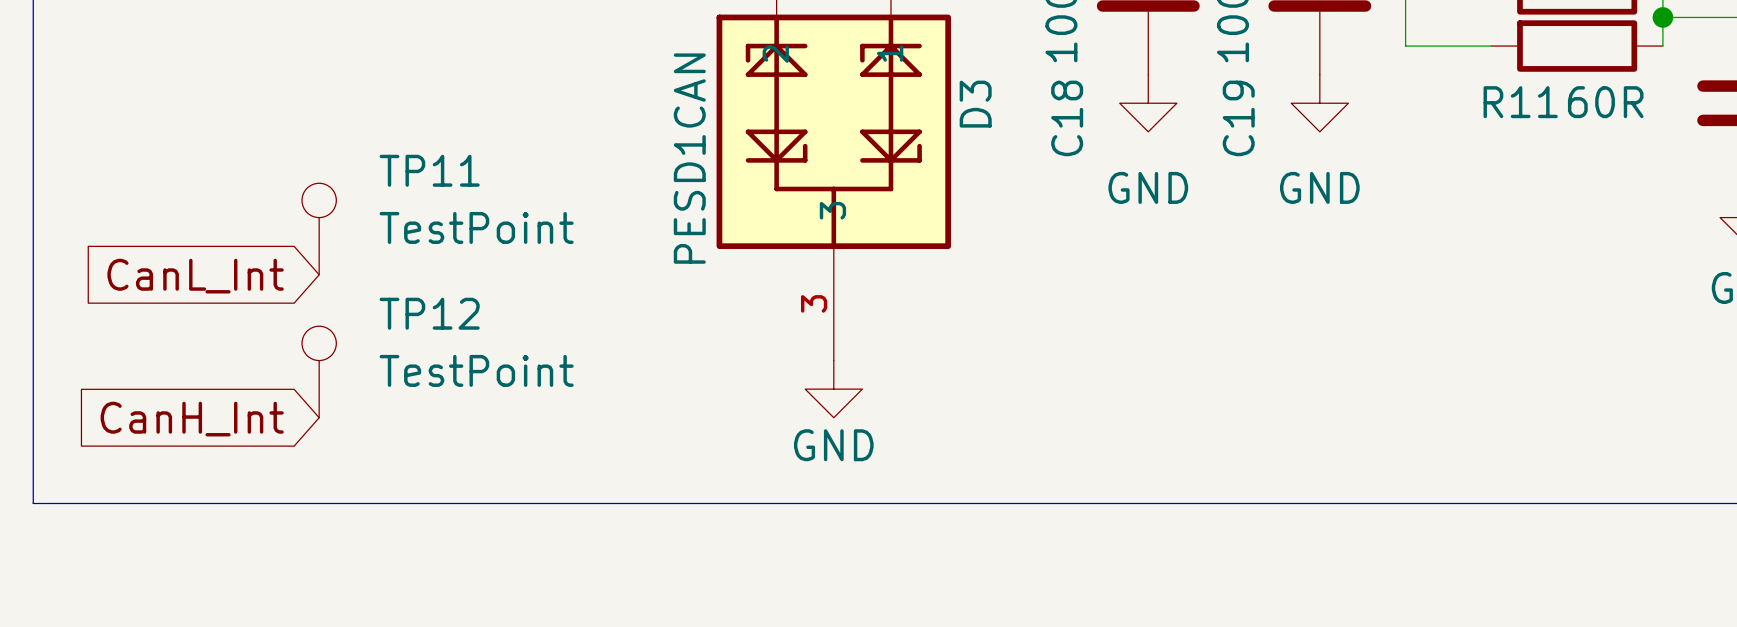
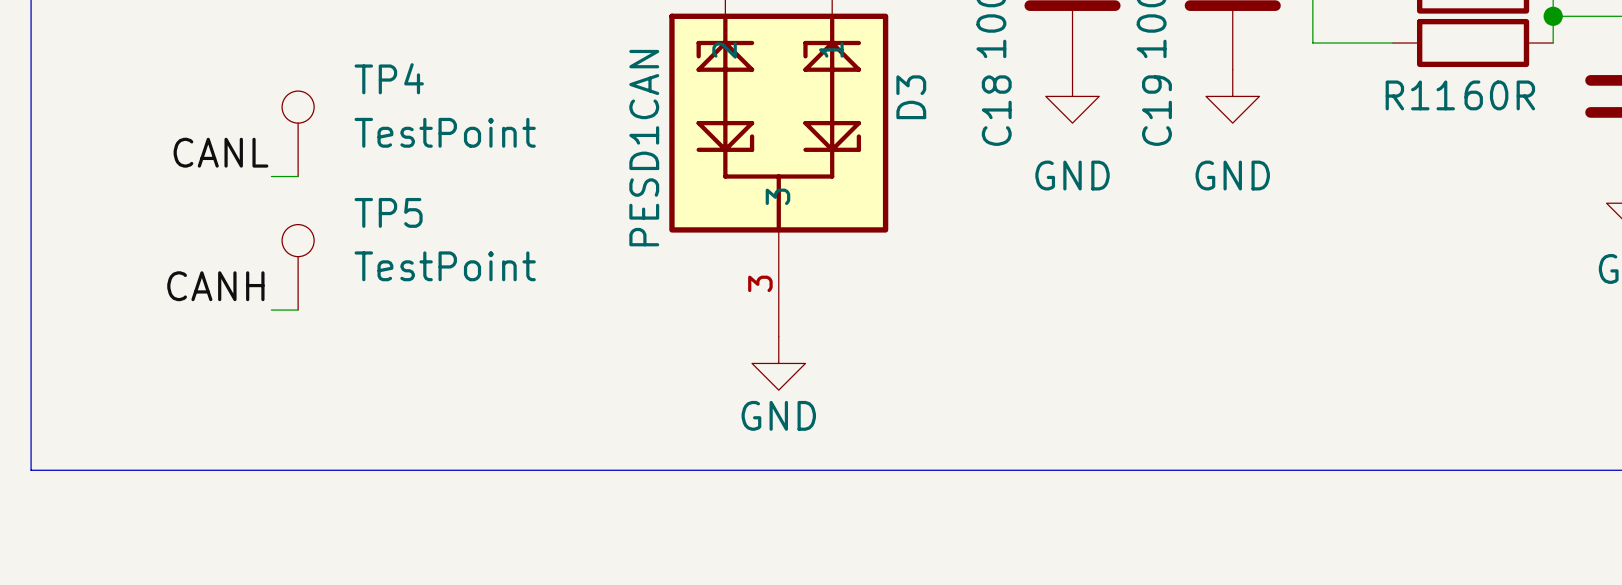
TP4: none -> TestPoint (298, 133)
label: none -> CANL (220, 152)
wire: none -> (271, 176) (298, 176)
TP11: TestPoint (319, 229) -> none
global label: CanL_Int (195, 276) -> none
TP5: none -> TestPoint (298, 267)
label: none -> CANH (215, 286)
wire: none -> (271, 310) (298, 310)
TP12: TestPoint (319, 371) -> none
global label: CanH_Int (192, 419) -> none

